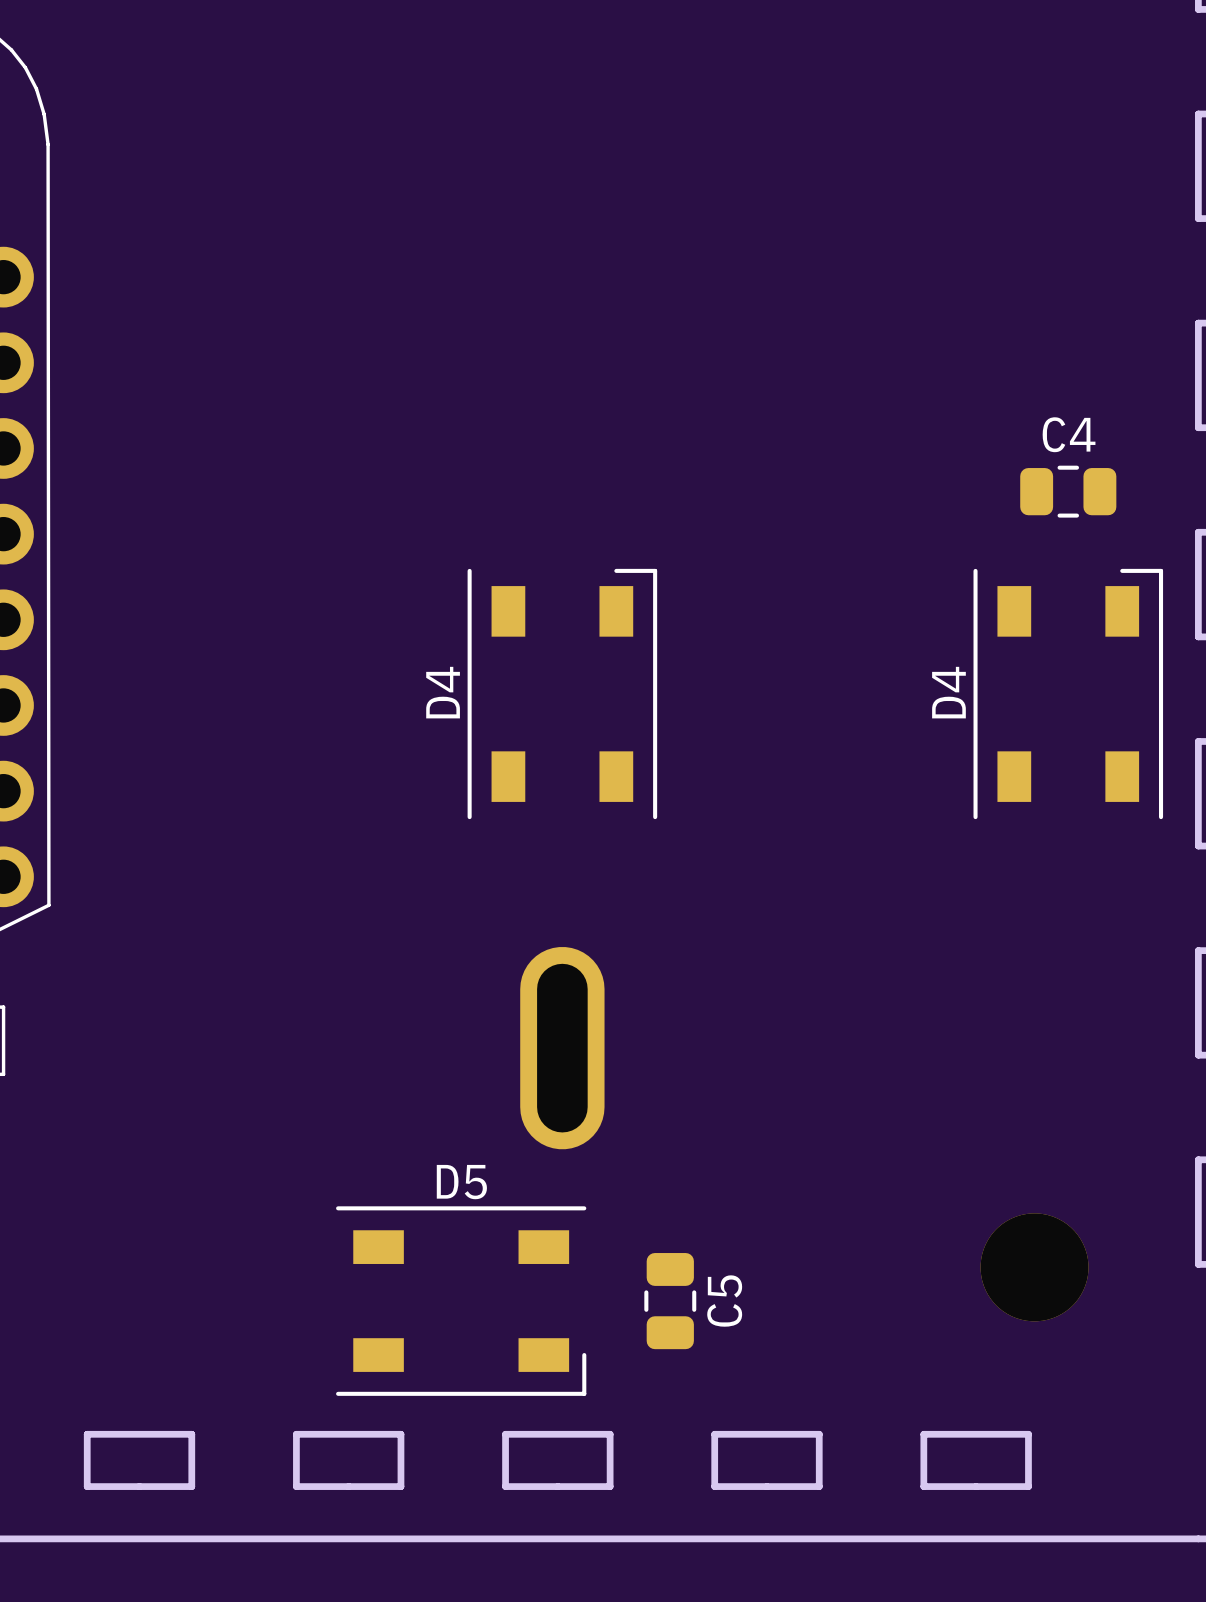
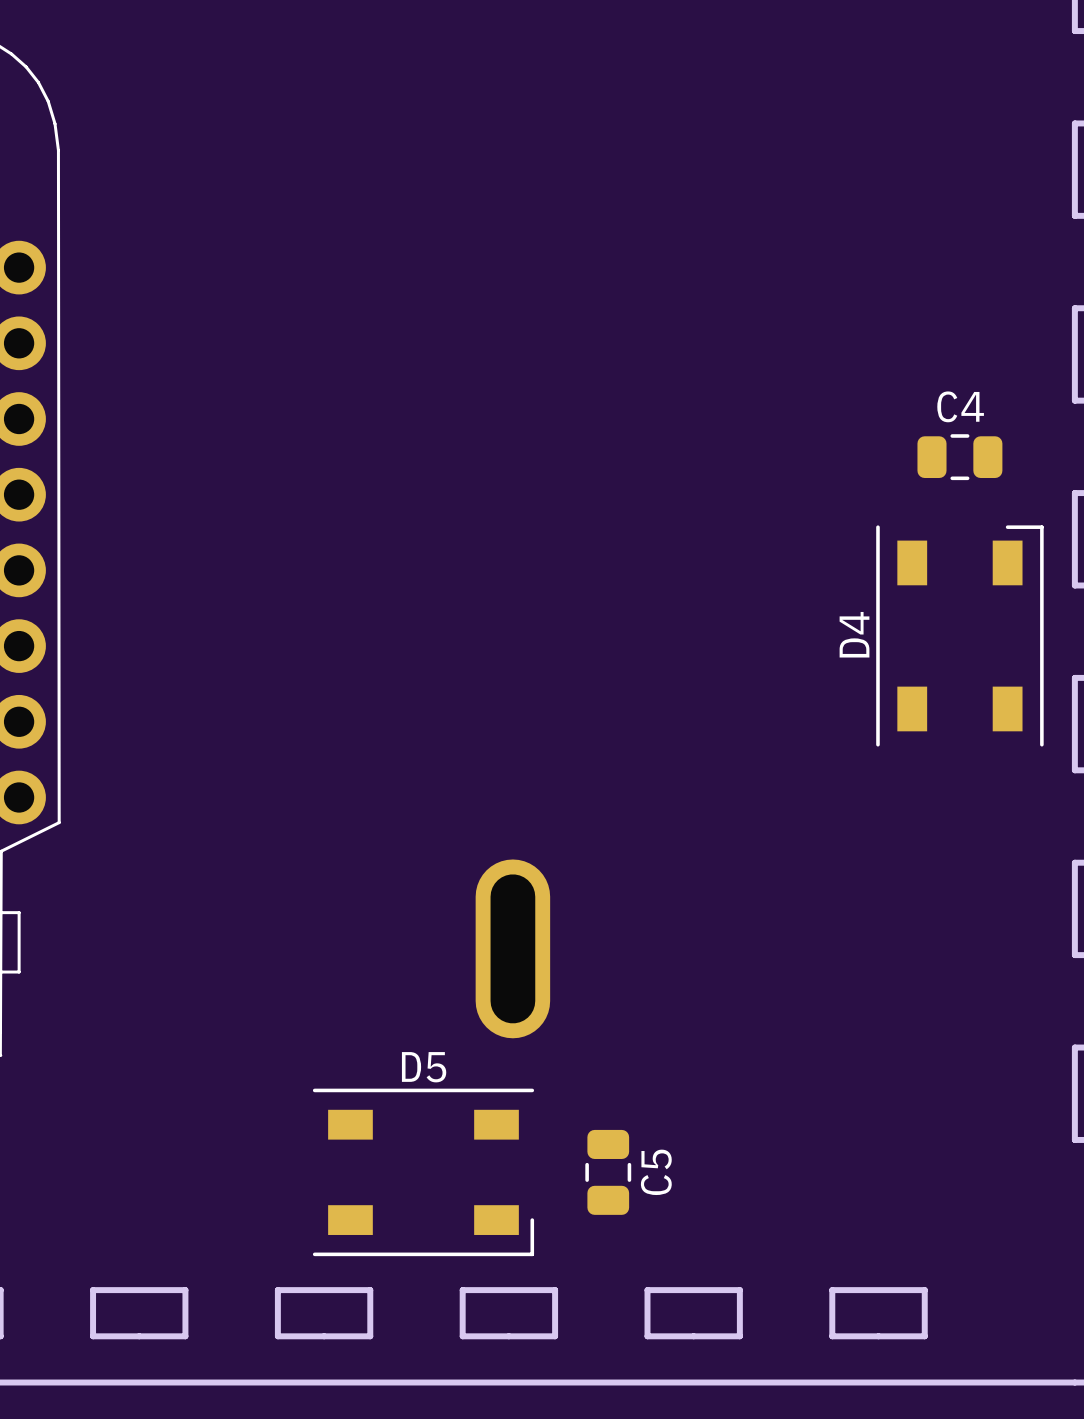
D4: (562, 694) -> none
part: (1034, 1267) -> none

